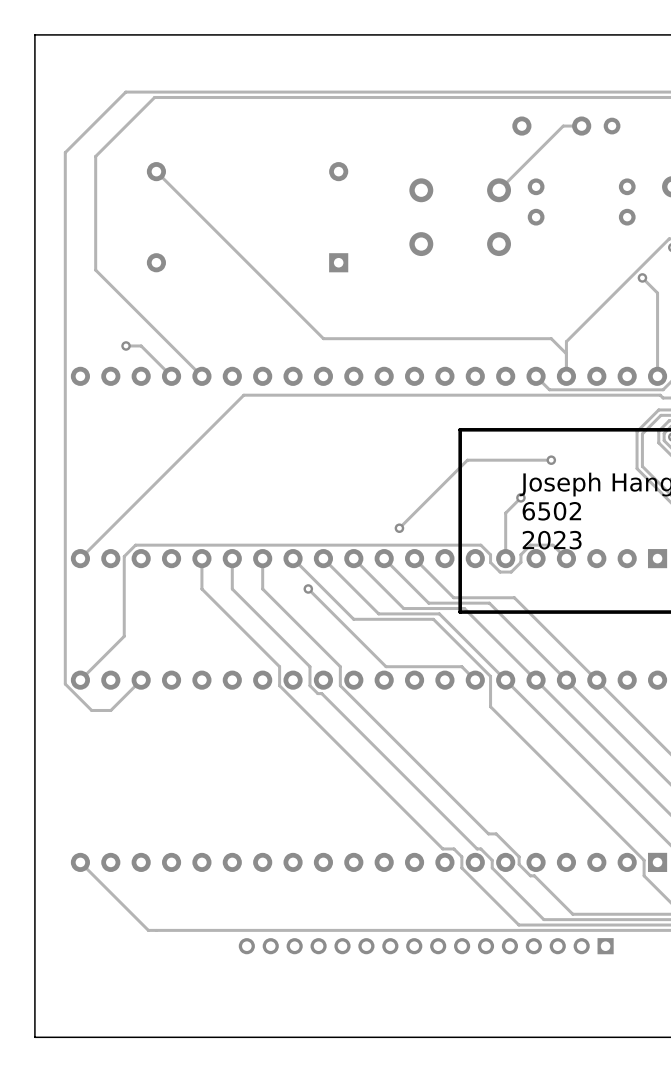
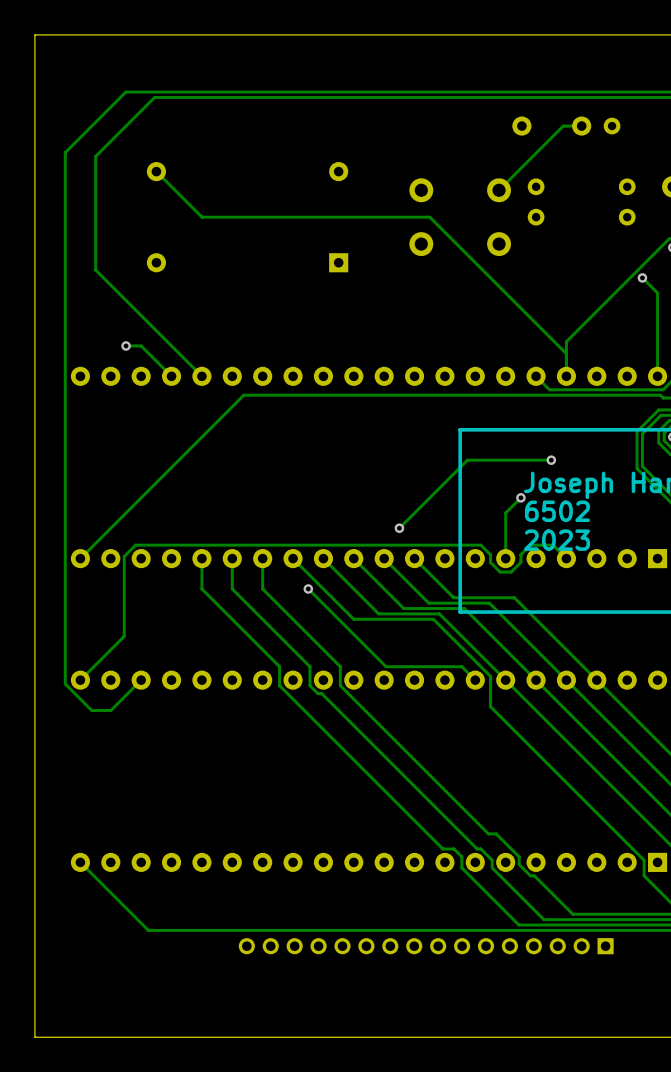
track: (201, 217) (323, 338) (551, 338) -> (201, 217) (429, 217) (551, 338)

